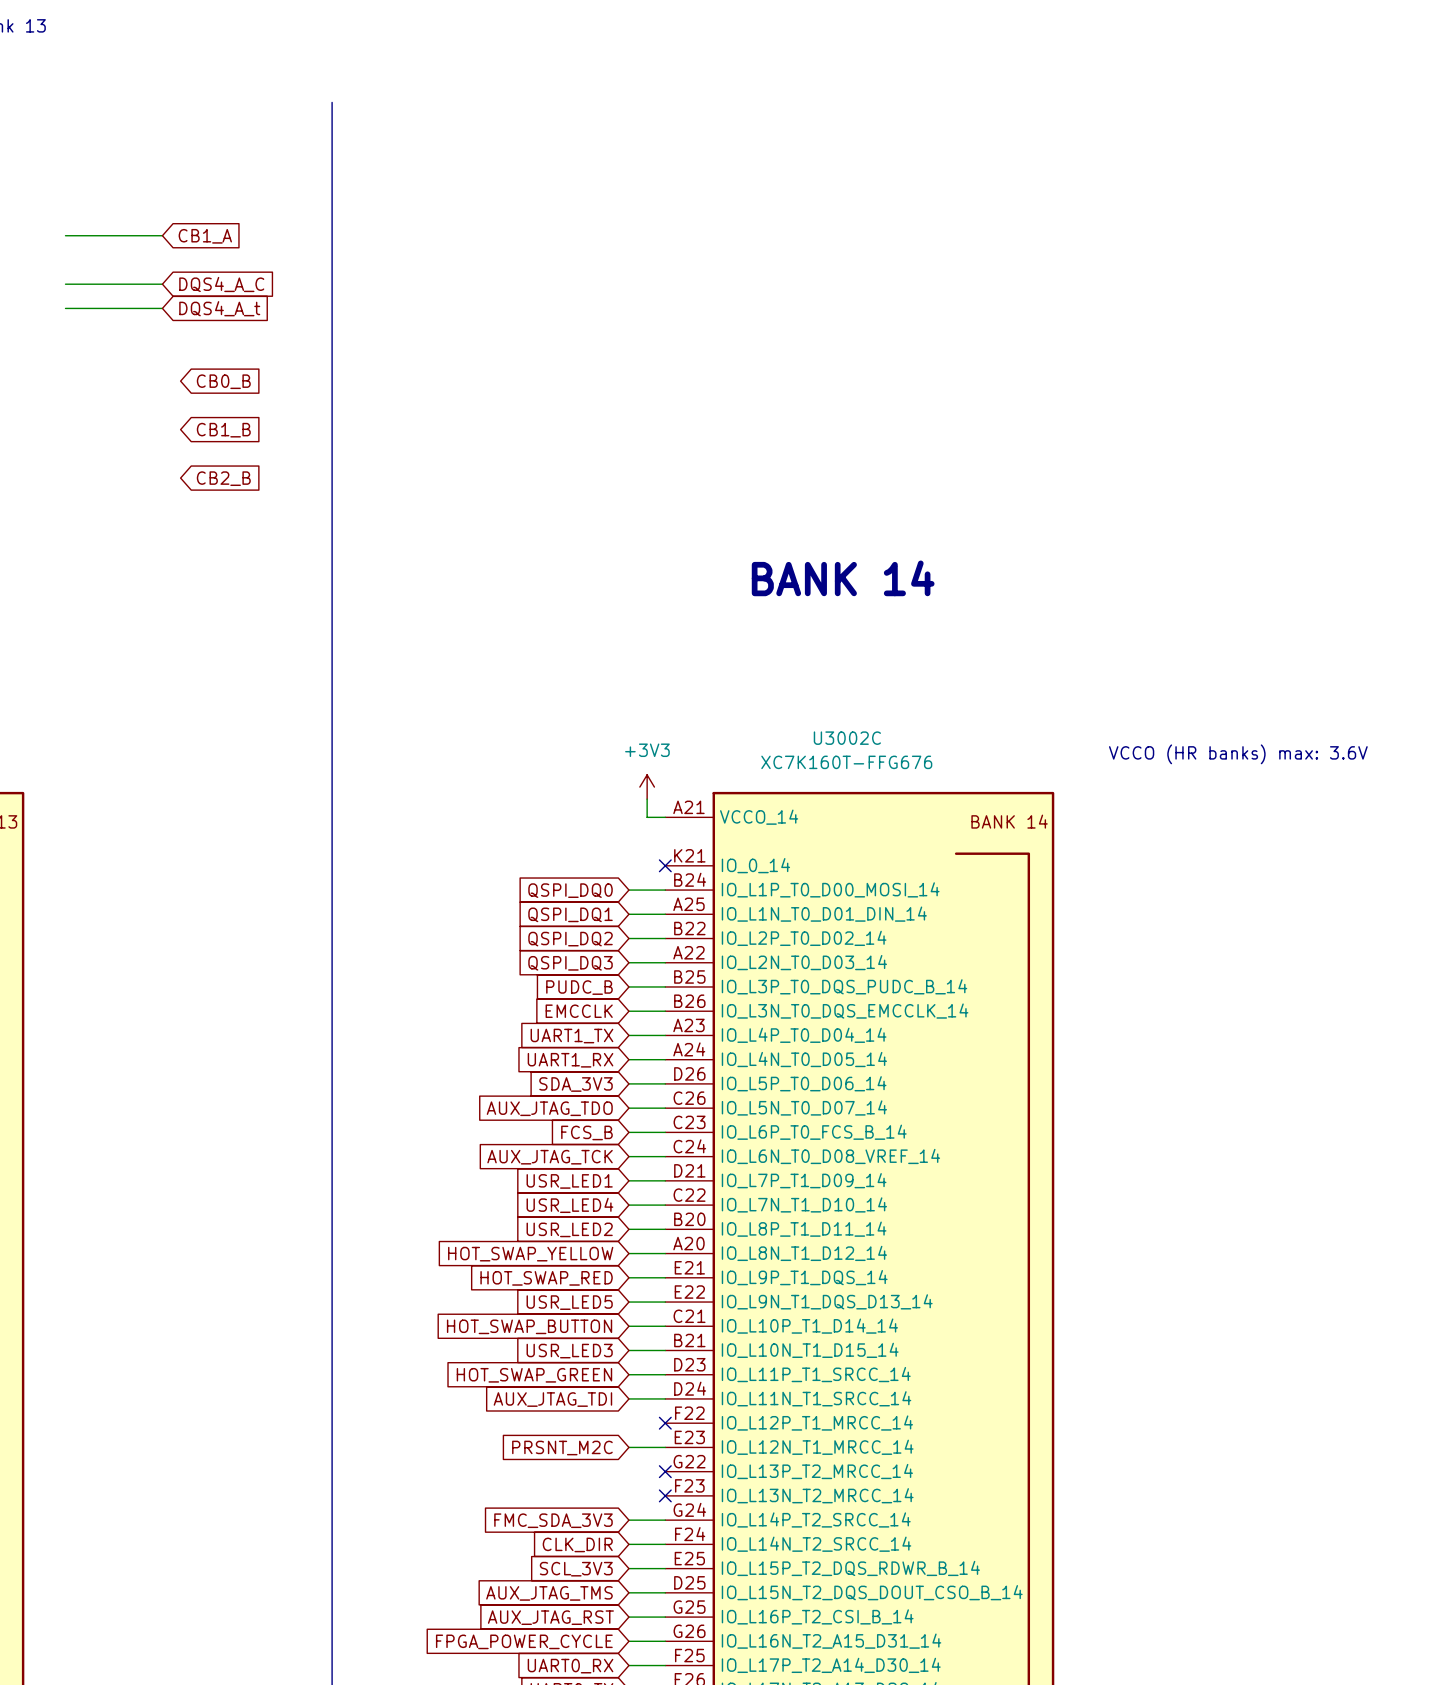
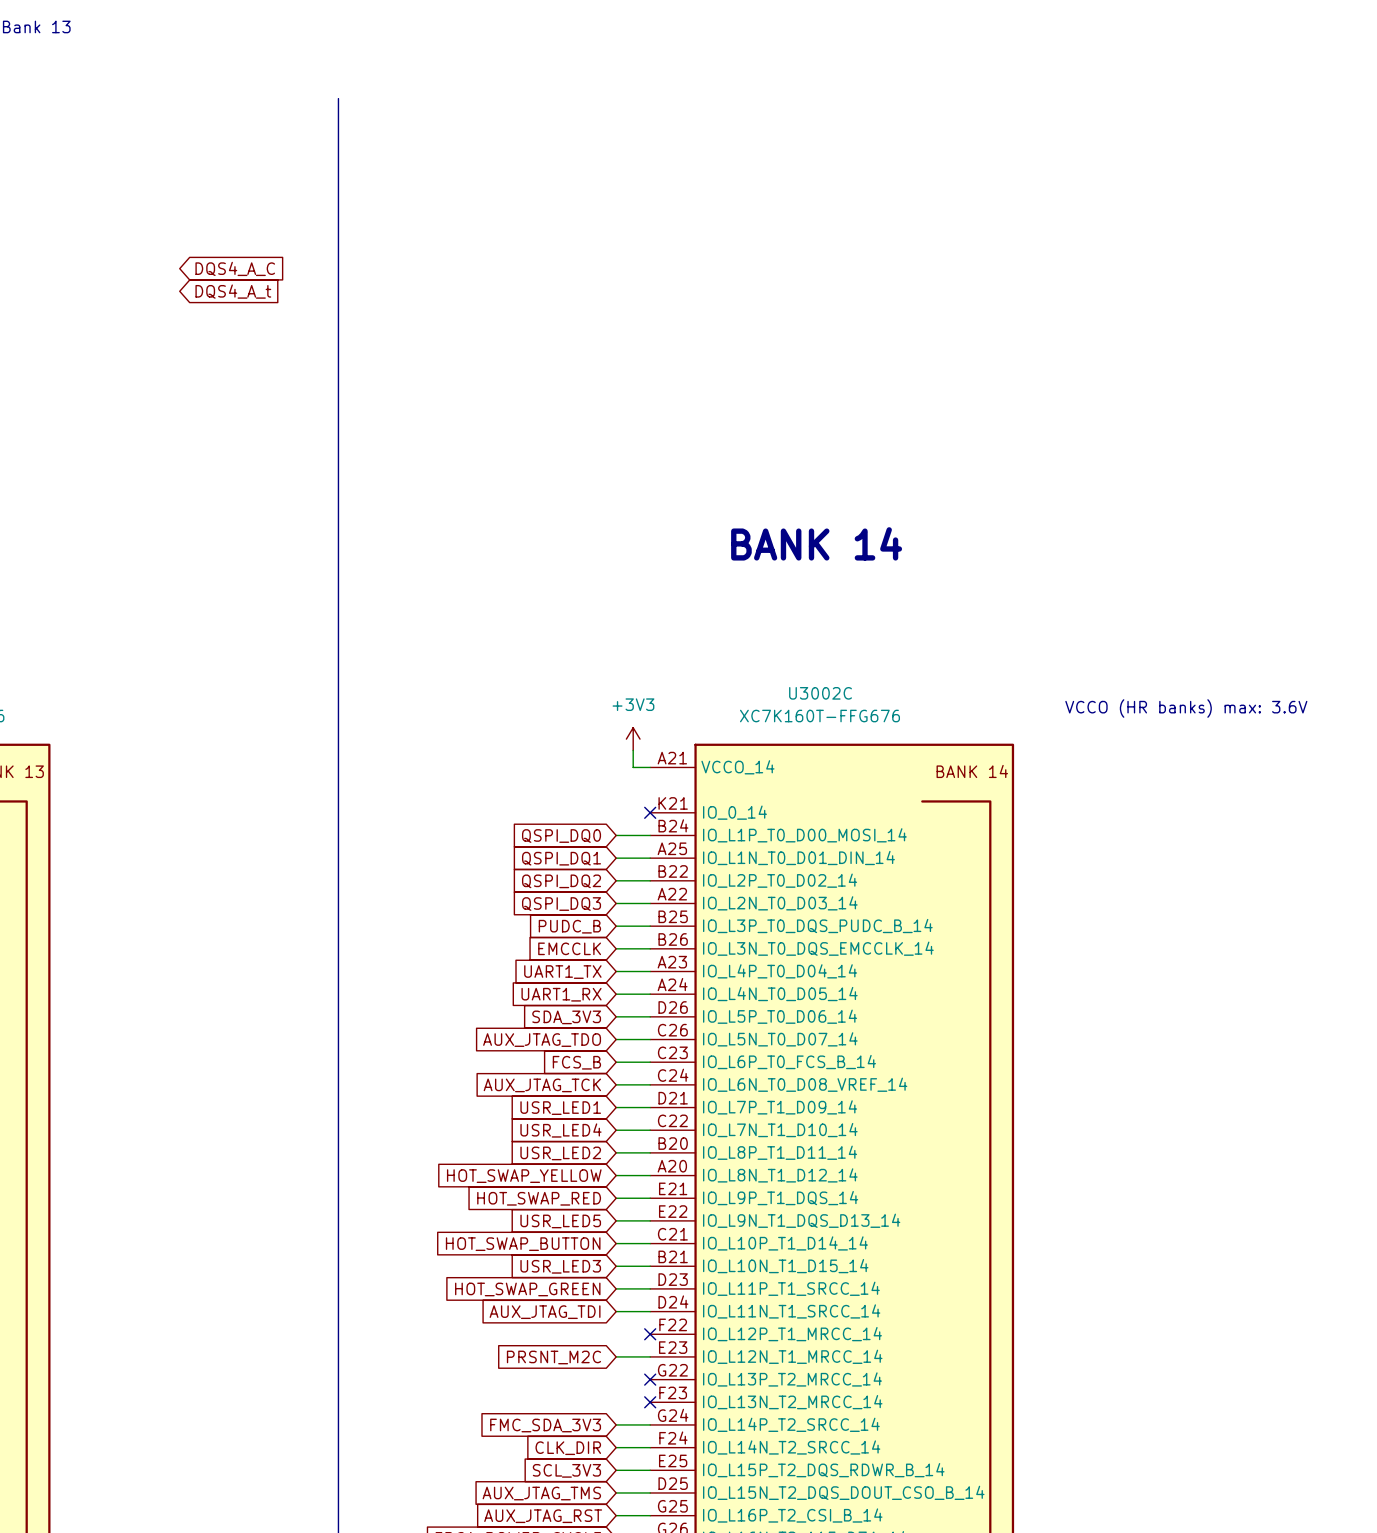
wire: (65, 235) (162, 235) -> none
global label: CB1_A (205, 236) -> none
wire: (65, 284) (162, 284) -> none
wire: (65, 308) (162, 308) -> none
global label: CB0_B (223, 381) -> none
global label: CB1_B (223, 430) -> none
global label: CB2_B (223, 478) -> none

